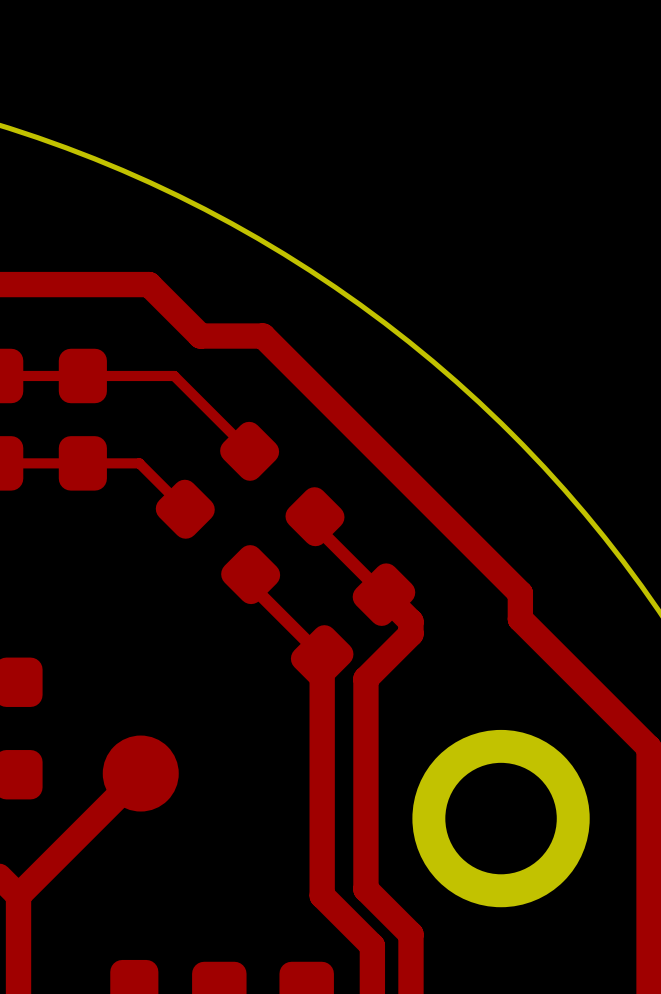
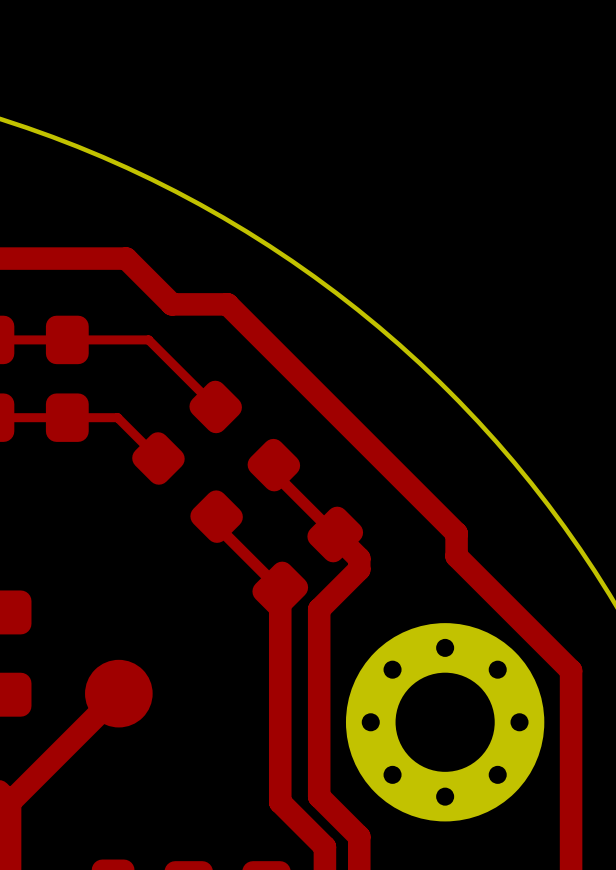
part footprint: [412, 729, 590, 908] -> [345, 623, 545, 822]

